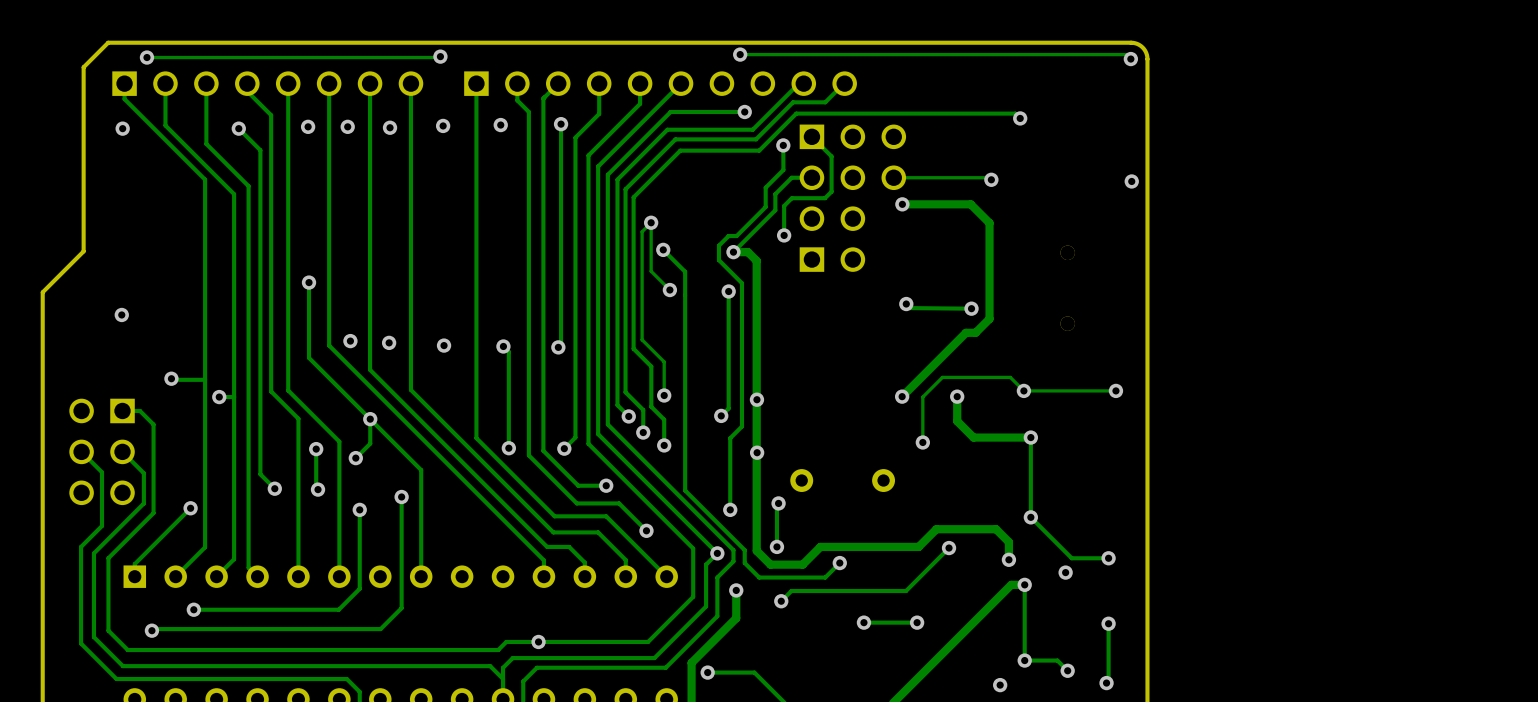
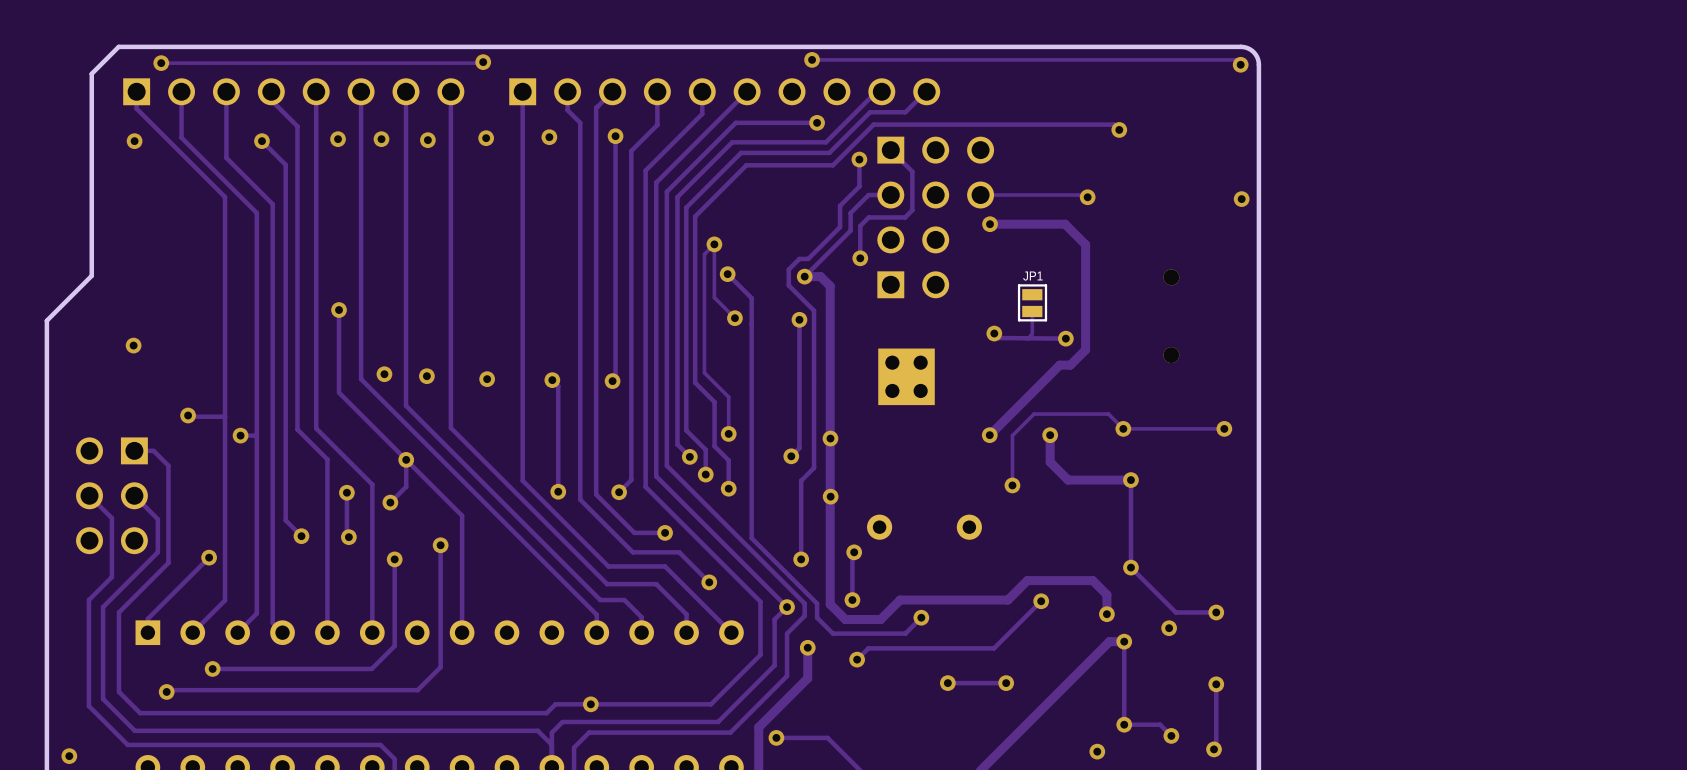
JP1: none -> (1032, 302)
track: none -> (1032, 311) (1032, 334) (1028, 338)
part: none -> (906, 376)
via: none -> (69, 756)

